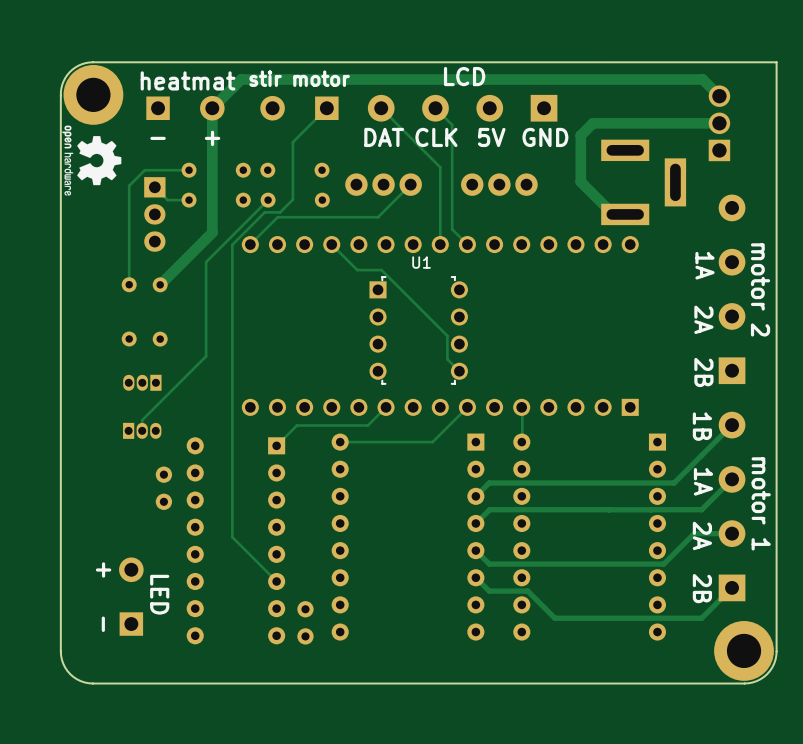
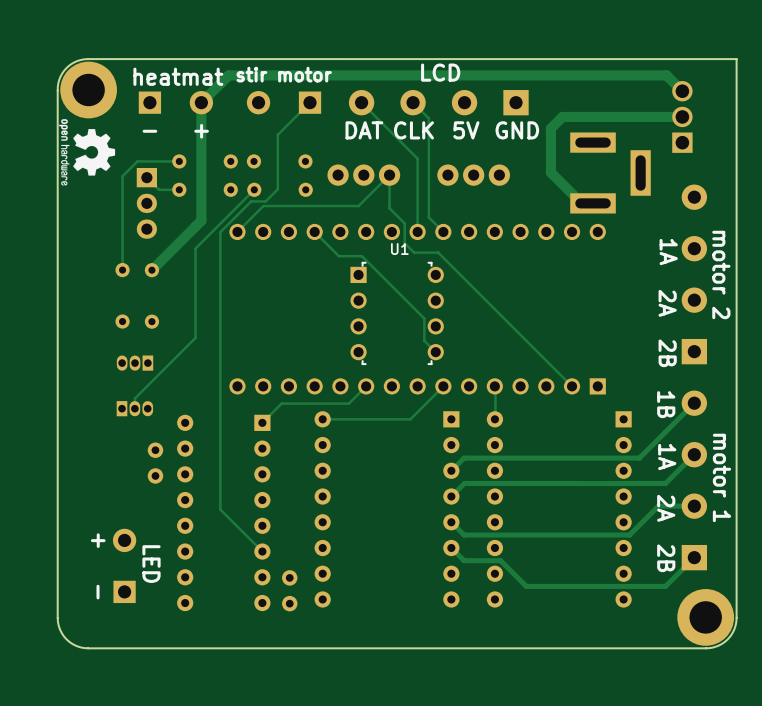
track: none -> (389, 175) (389, 208) (404, 223) (404, 243) (414, 252) (438, 252) (572, 386)

